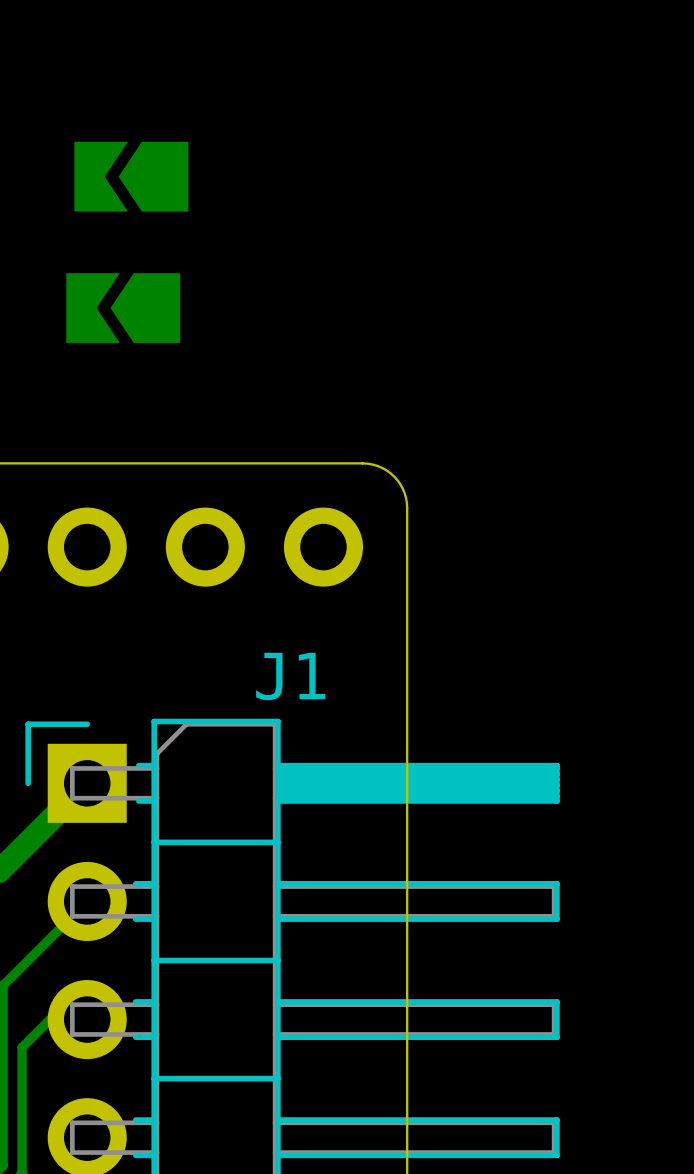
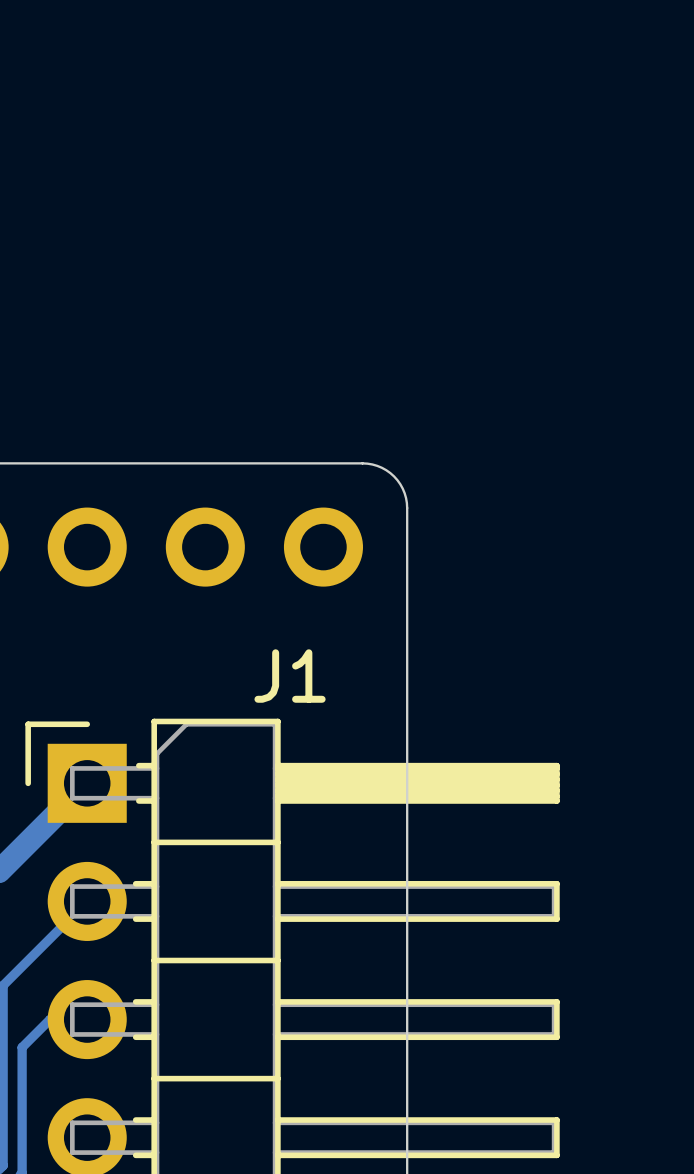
part: (131, 176) -> none
part: (123, 308) -> none

